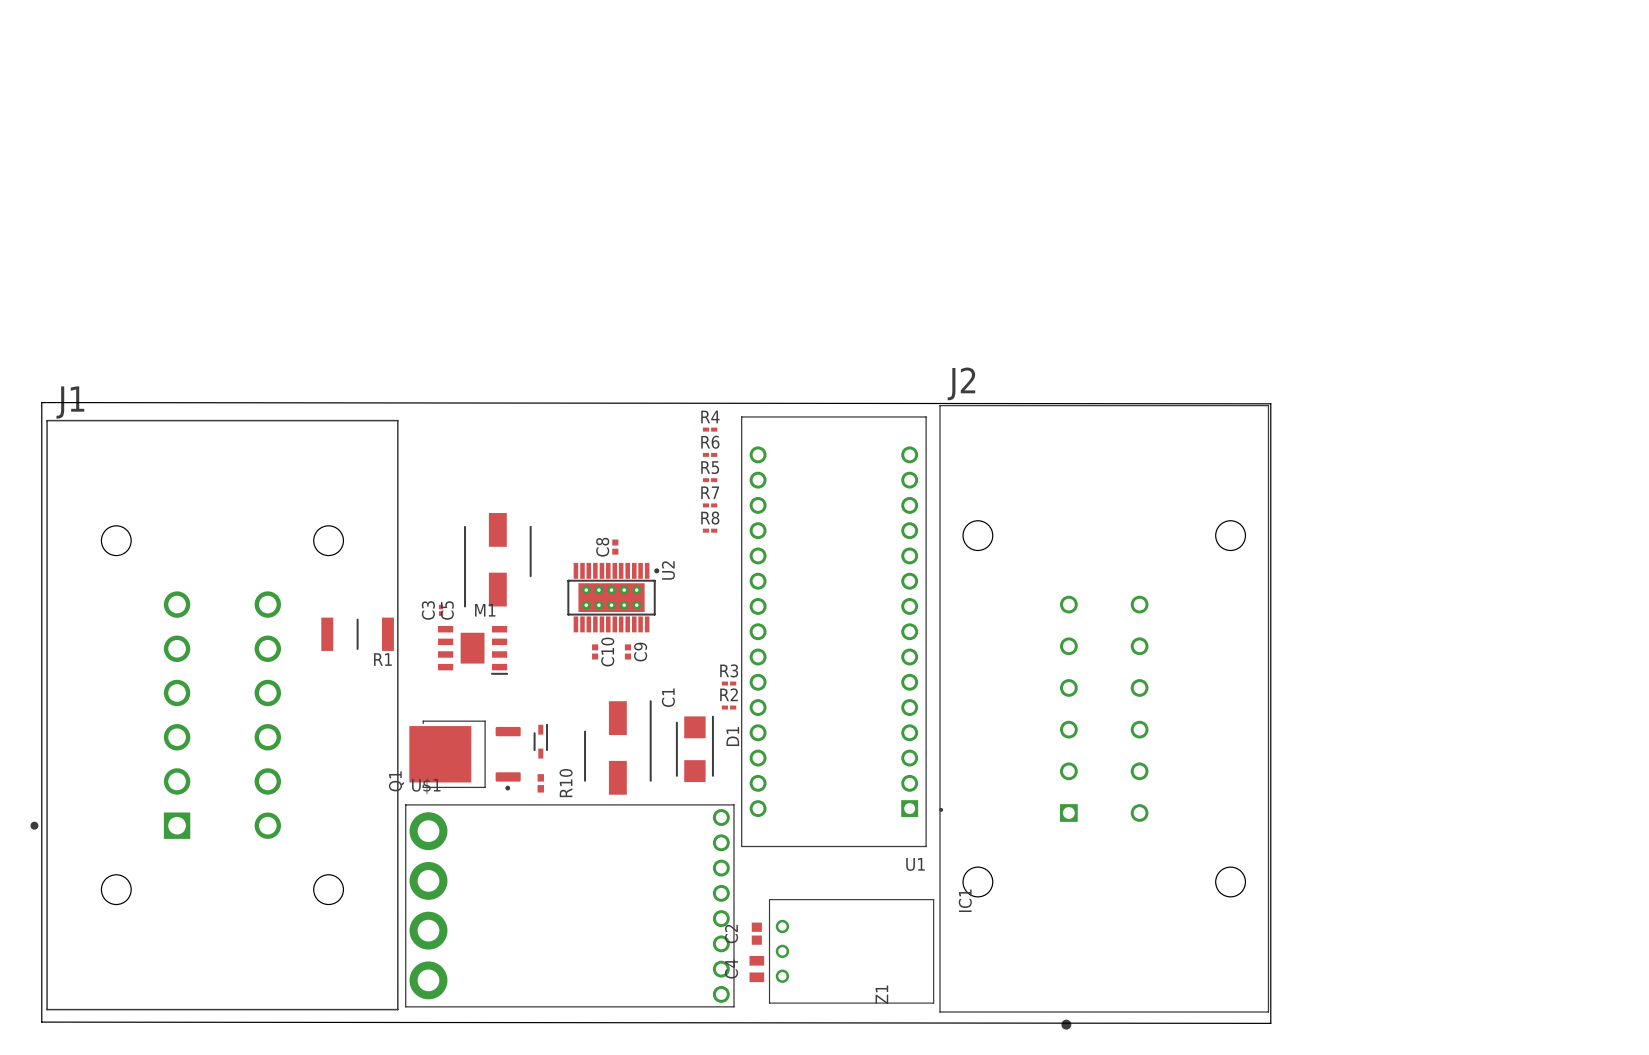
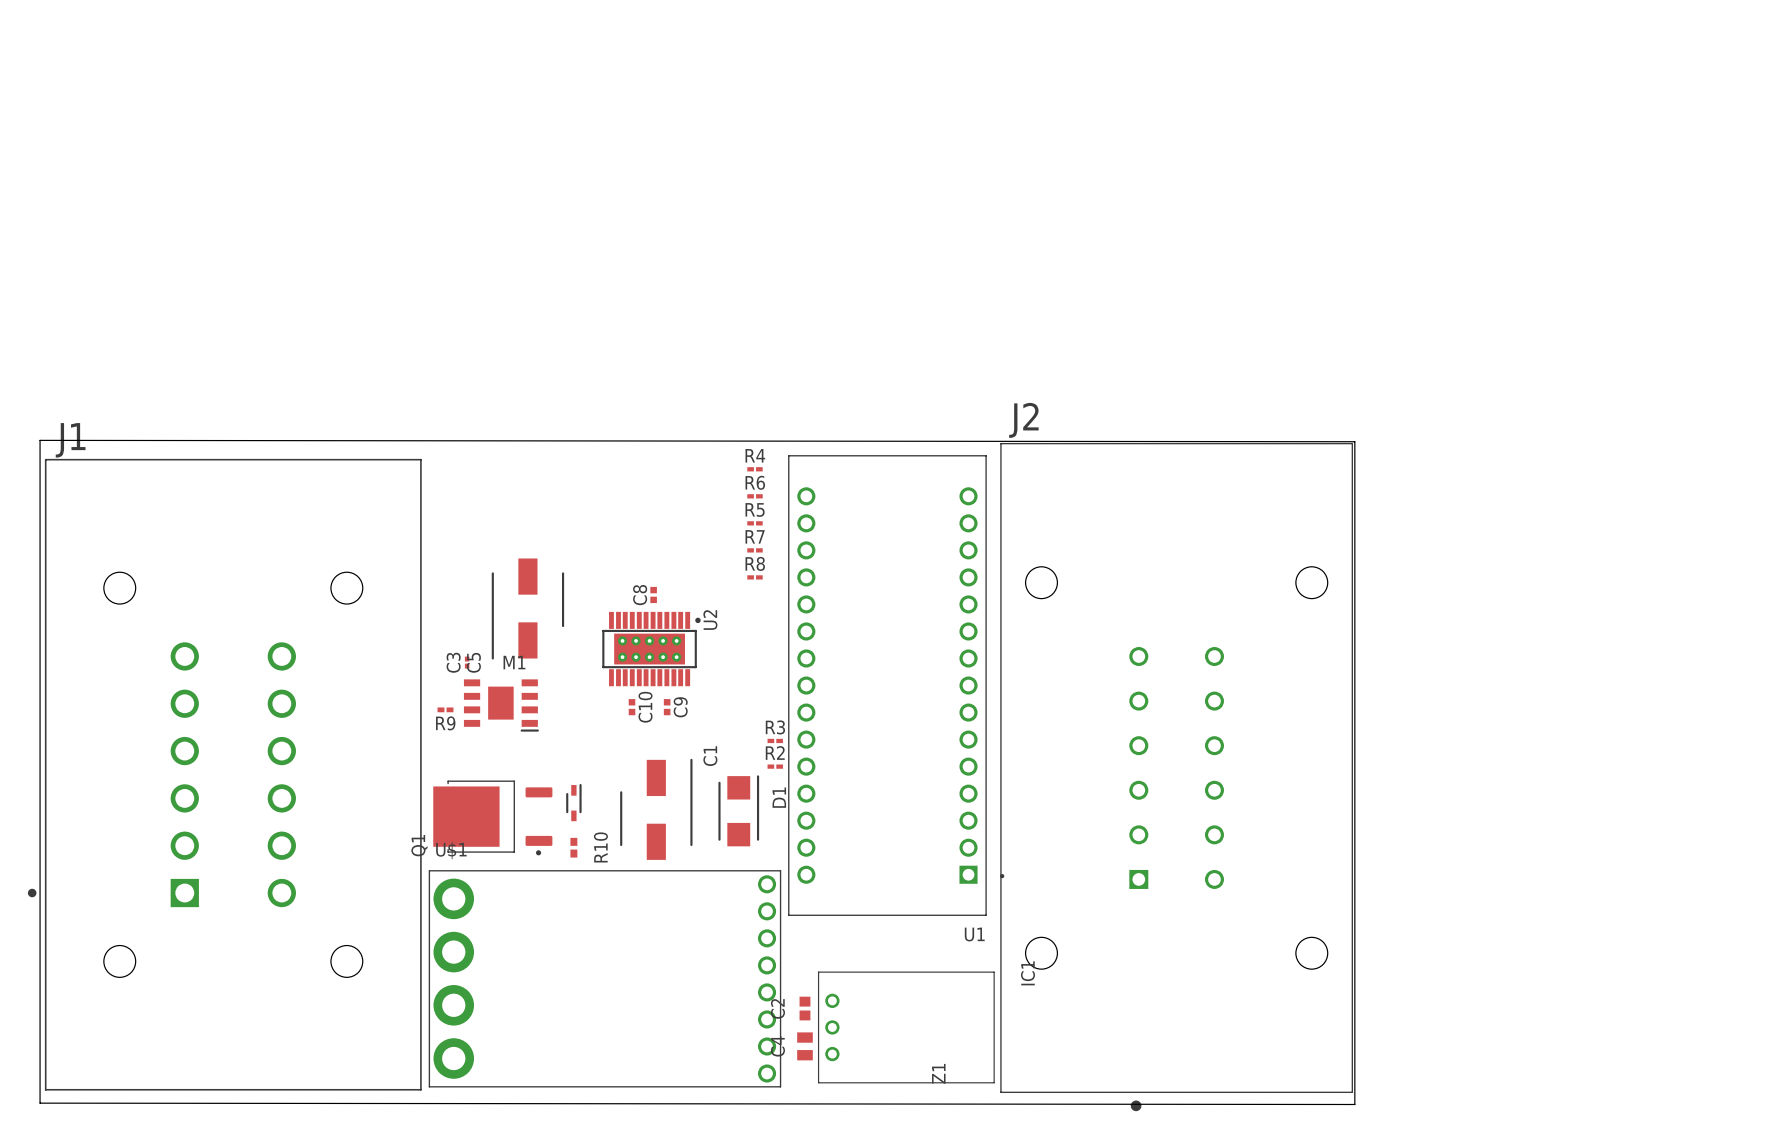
R1: (357, 634) -> none
R9: none -> (445, 709)

